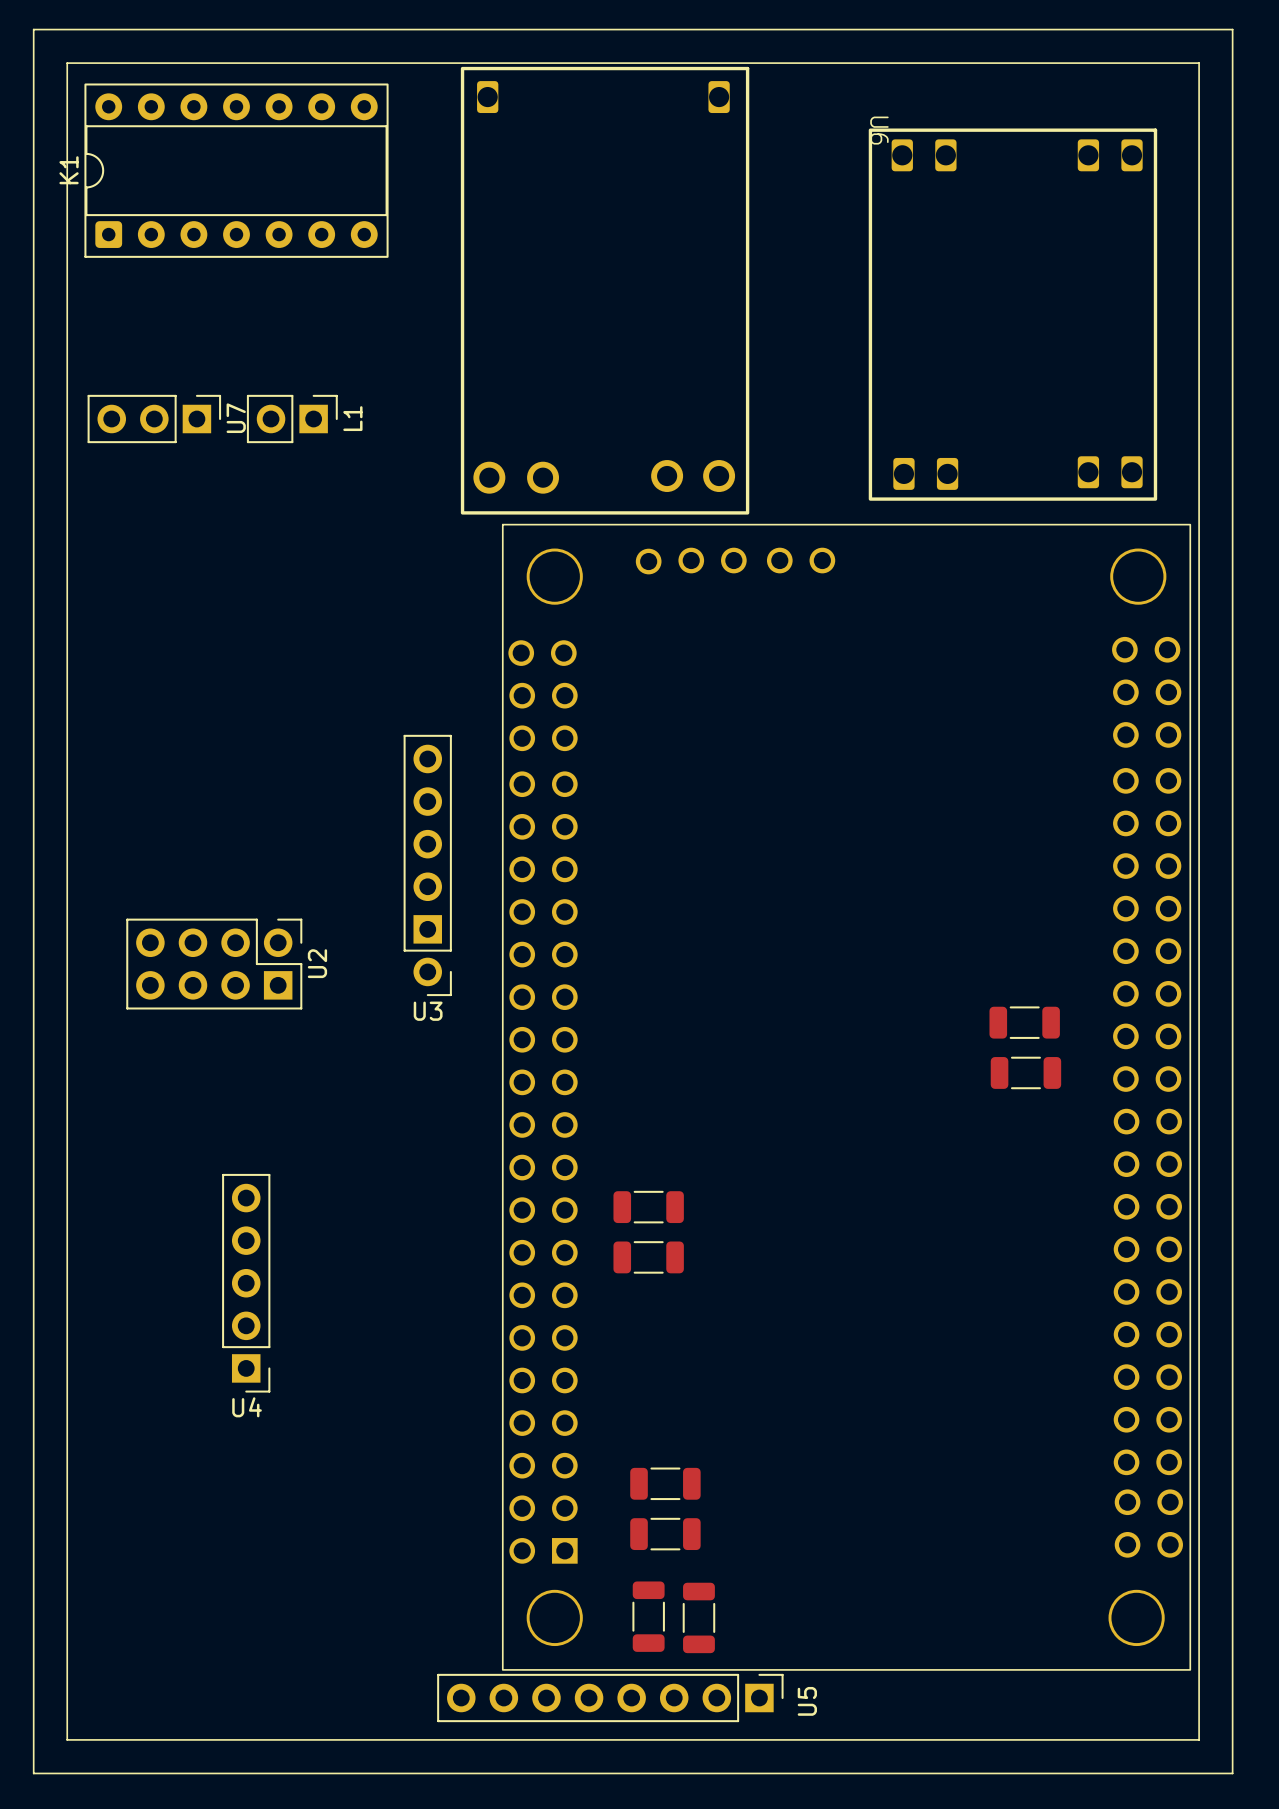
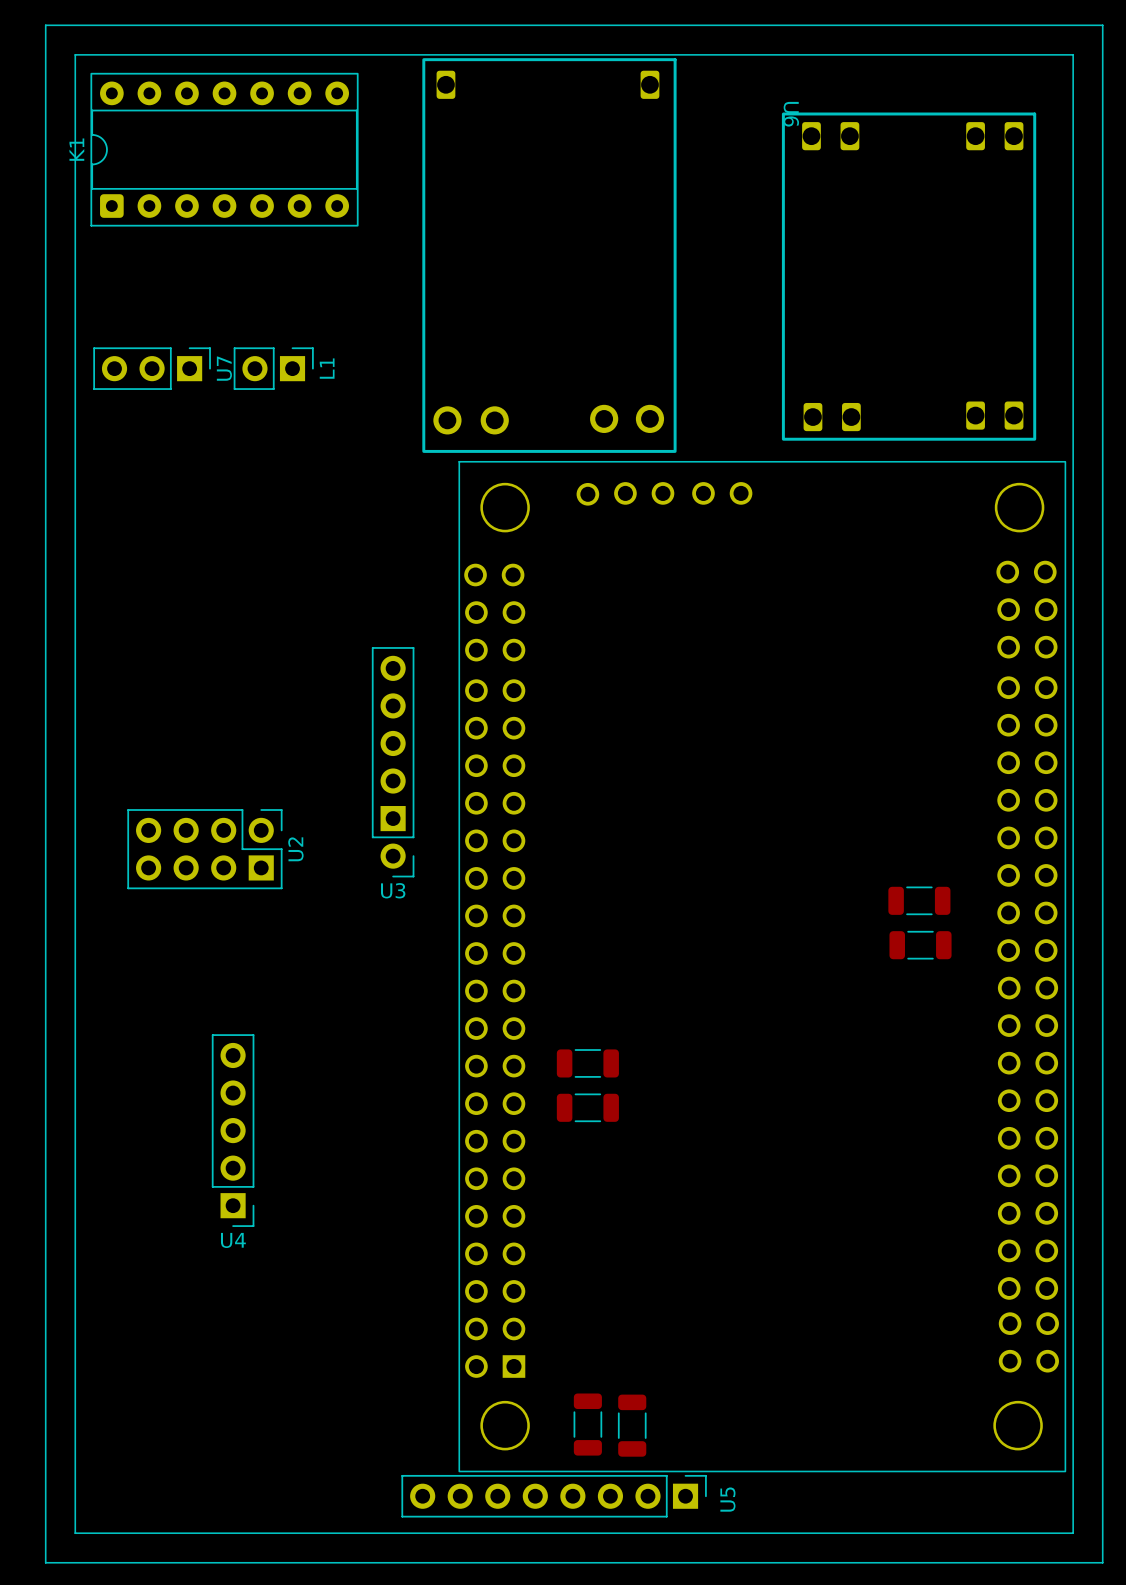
part: (665, 1483) -> none
part: (665, 1534) -> none

